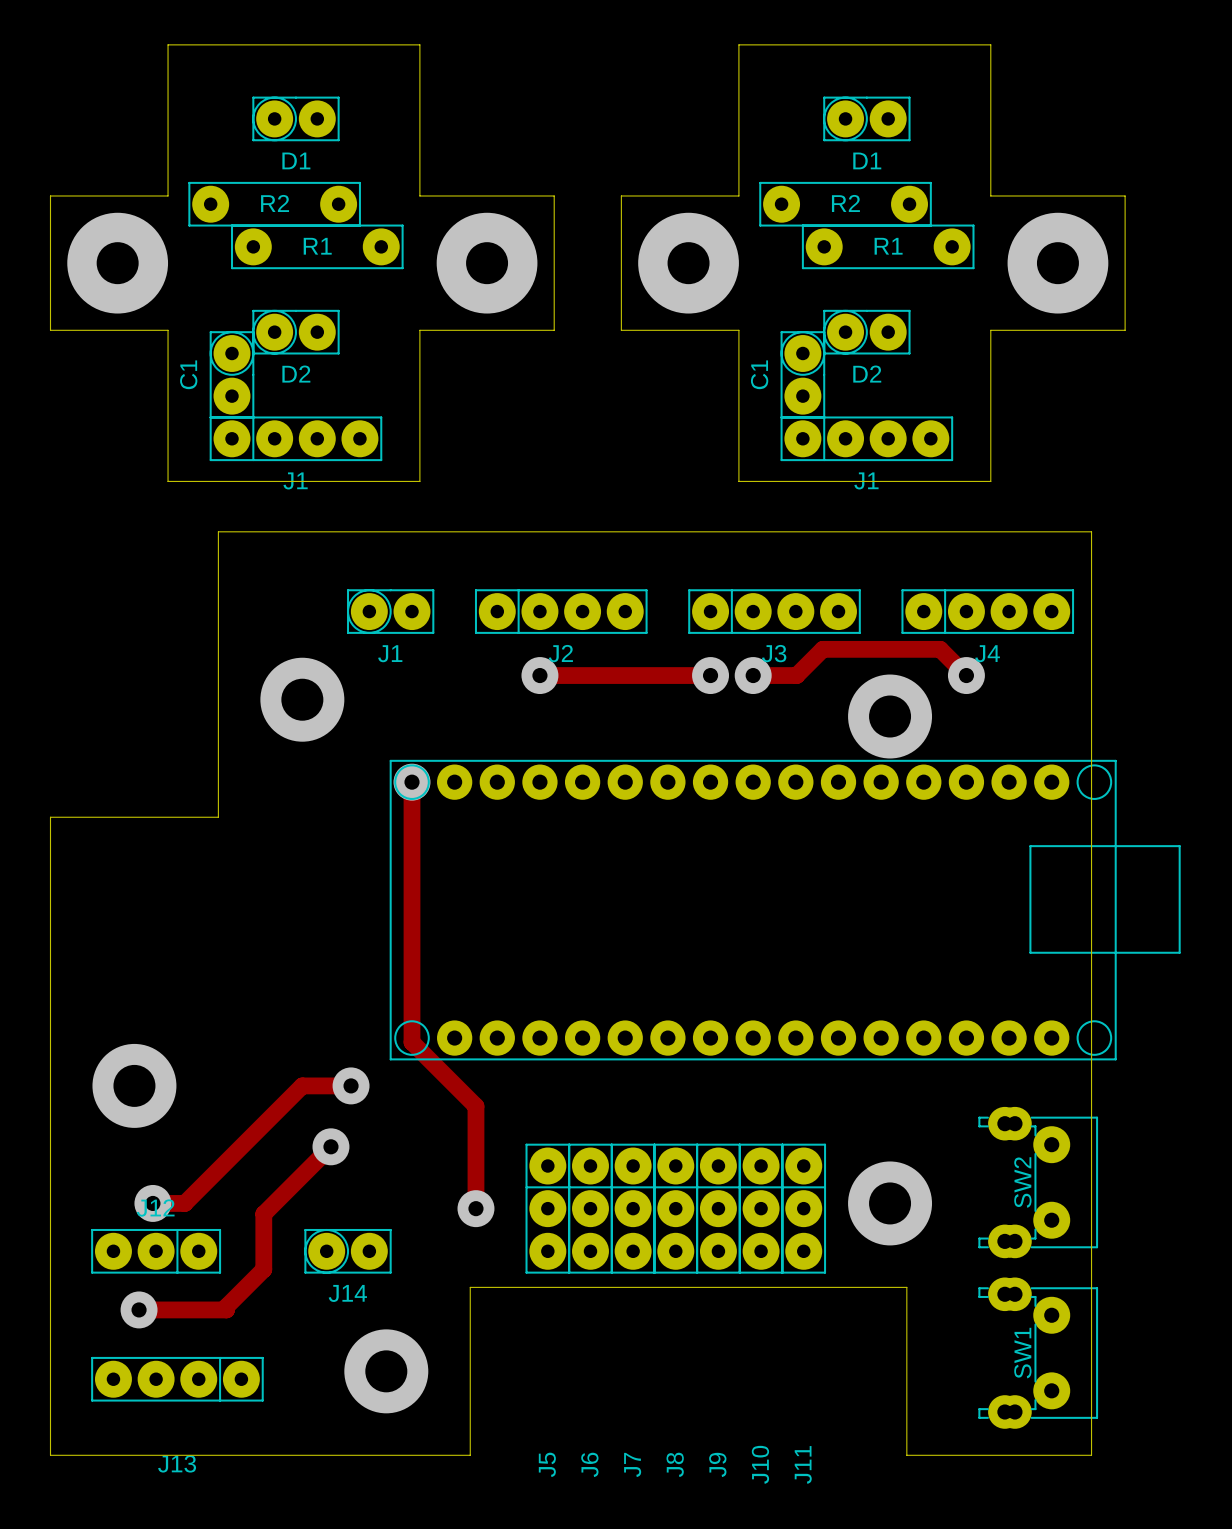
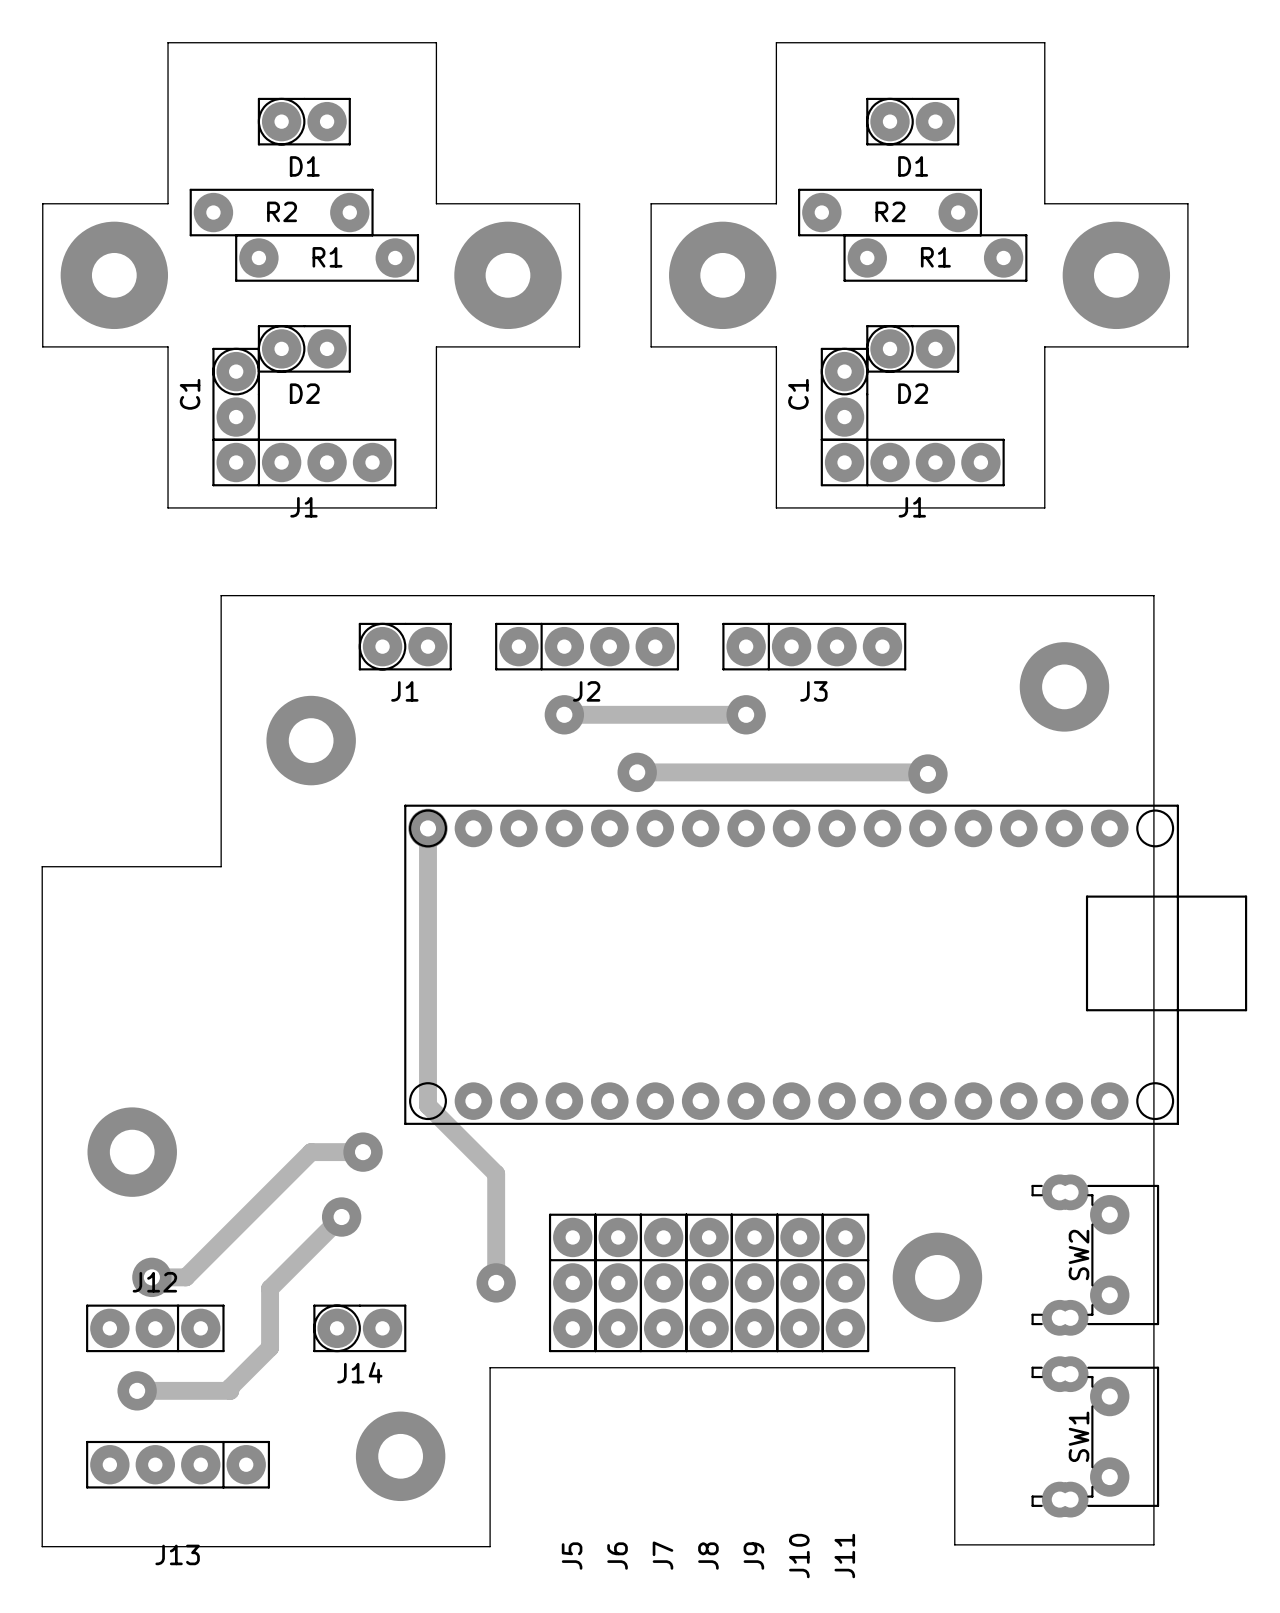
J4: (987, 611) -> none
via: none -> (1064, 686)
track: (753, 675) (796, 675) (822, 649) (940, 649) (966, 675) -> none
via: (753, 675) -> none
via: (966, 675) -> none
via: (890, 716) -> none
track: none -> (637, 772) (926, 772) (927, 774)
via: none -> (637, 772)
via: none -> (927, 774)
board edge: (470, 1288) (906, 1287) (906, 1455) (1091, 1455) (1091, 531) (218, 531) (218, 817) (50, 817) (50, 1455) (470, 1455) -> (490, 1367) (954, 1367) (954, 1544) (1153, 1544) (1153, 595) (221, 595) (221, 866) (42, 866) (42, 1546) (490, 1545)

